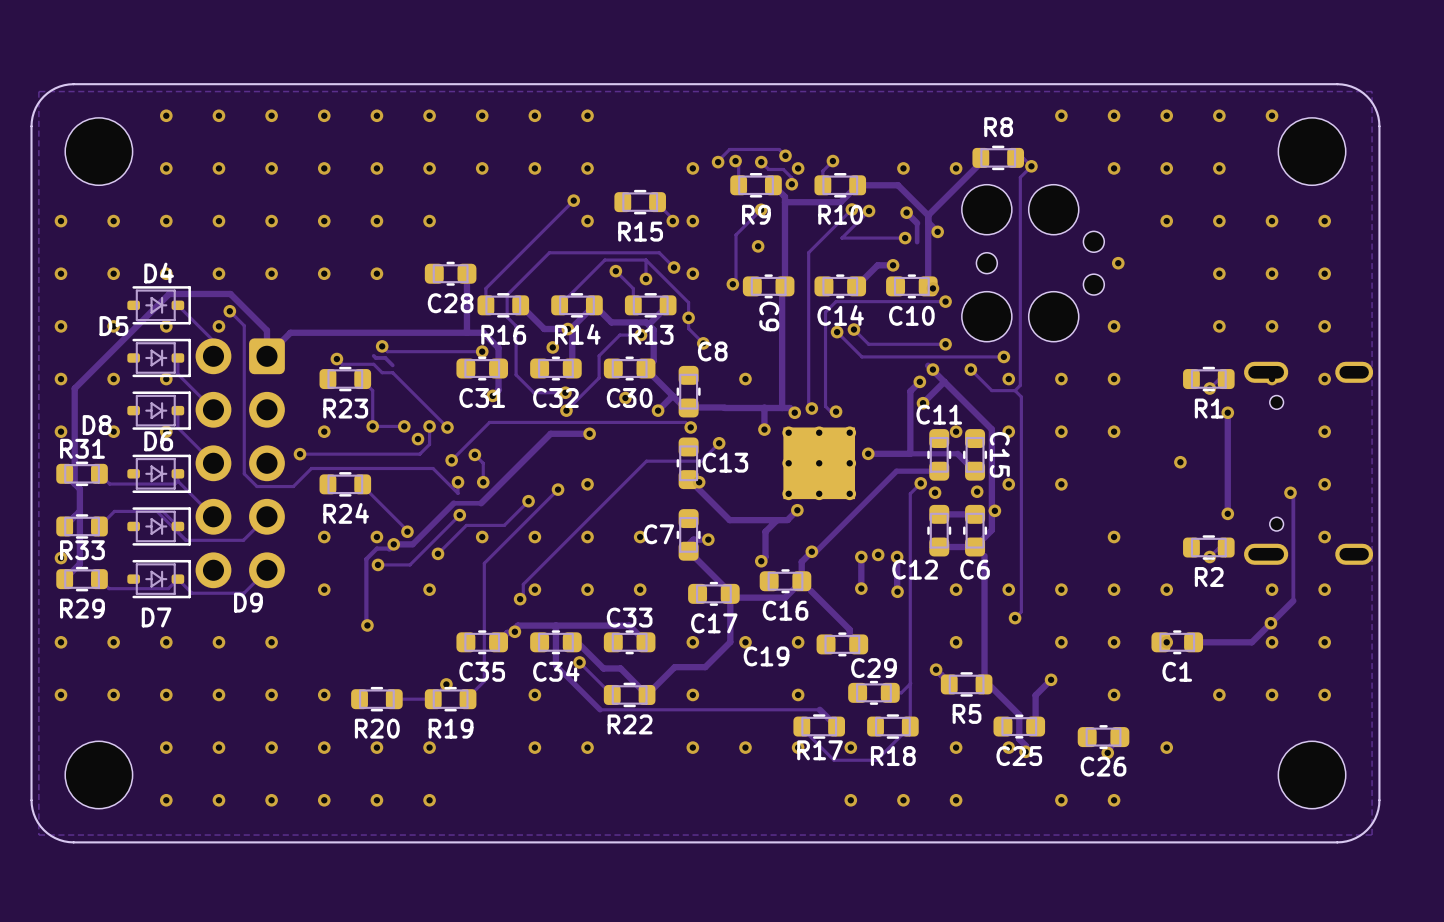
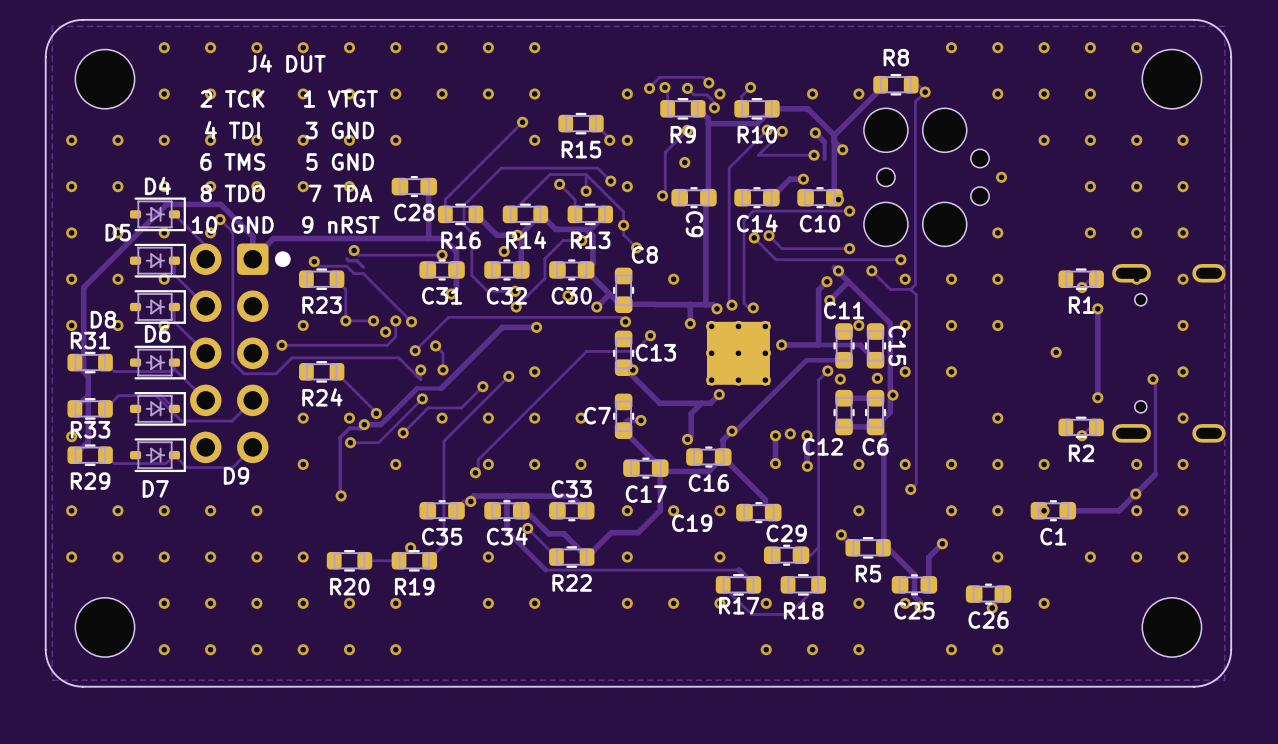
text: none -> J4 DUT (286, 63)
text: none -> 2 TCK (232, 98)
text: none -> 1 VTGT (340, 98)
text: none -> 4 TDI (232, 130)
text: none -> 3 GND (339, 130)
text: none -> 6 TMS (232, 161)
text: none -> 5 GND (340, 161)
text: none -> 8 TDO (232, 193)
text: none -> 7 TDA (340, 193)
text: none -> 10 GND (232, 224)
text: none -> 9 nRST (340, 224)
drawing: none -> [274, 251, 291, 268]

